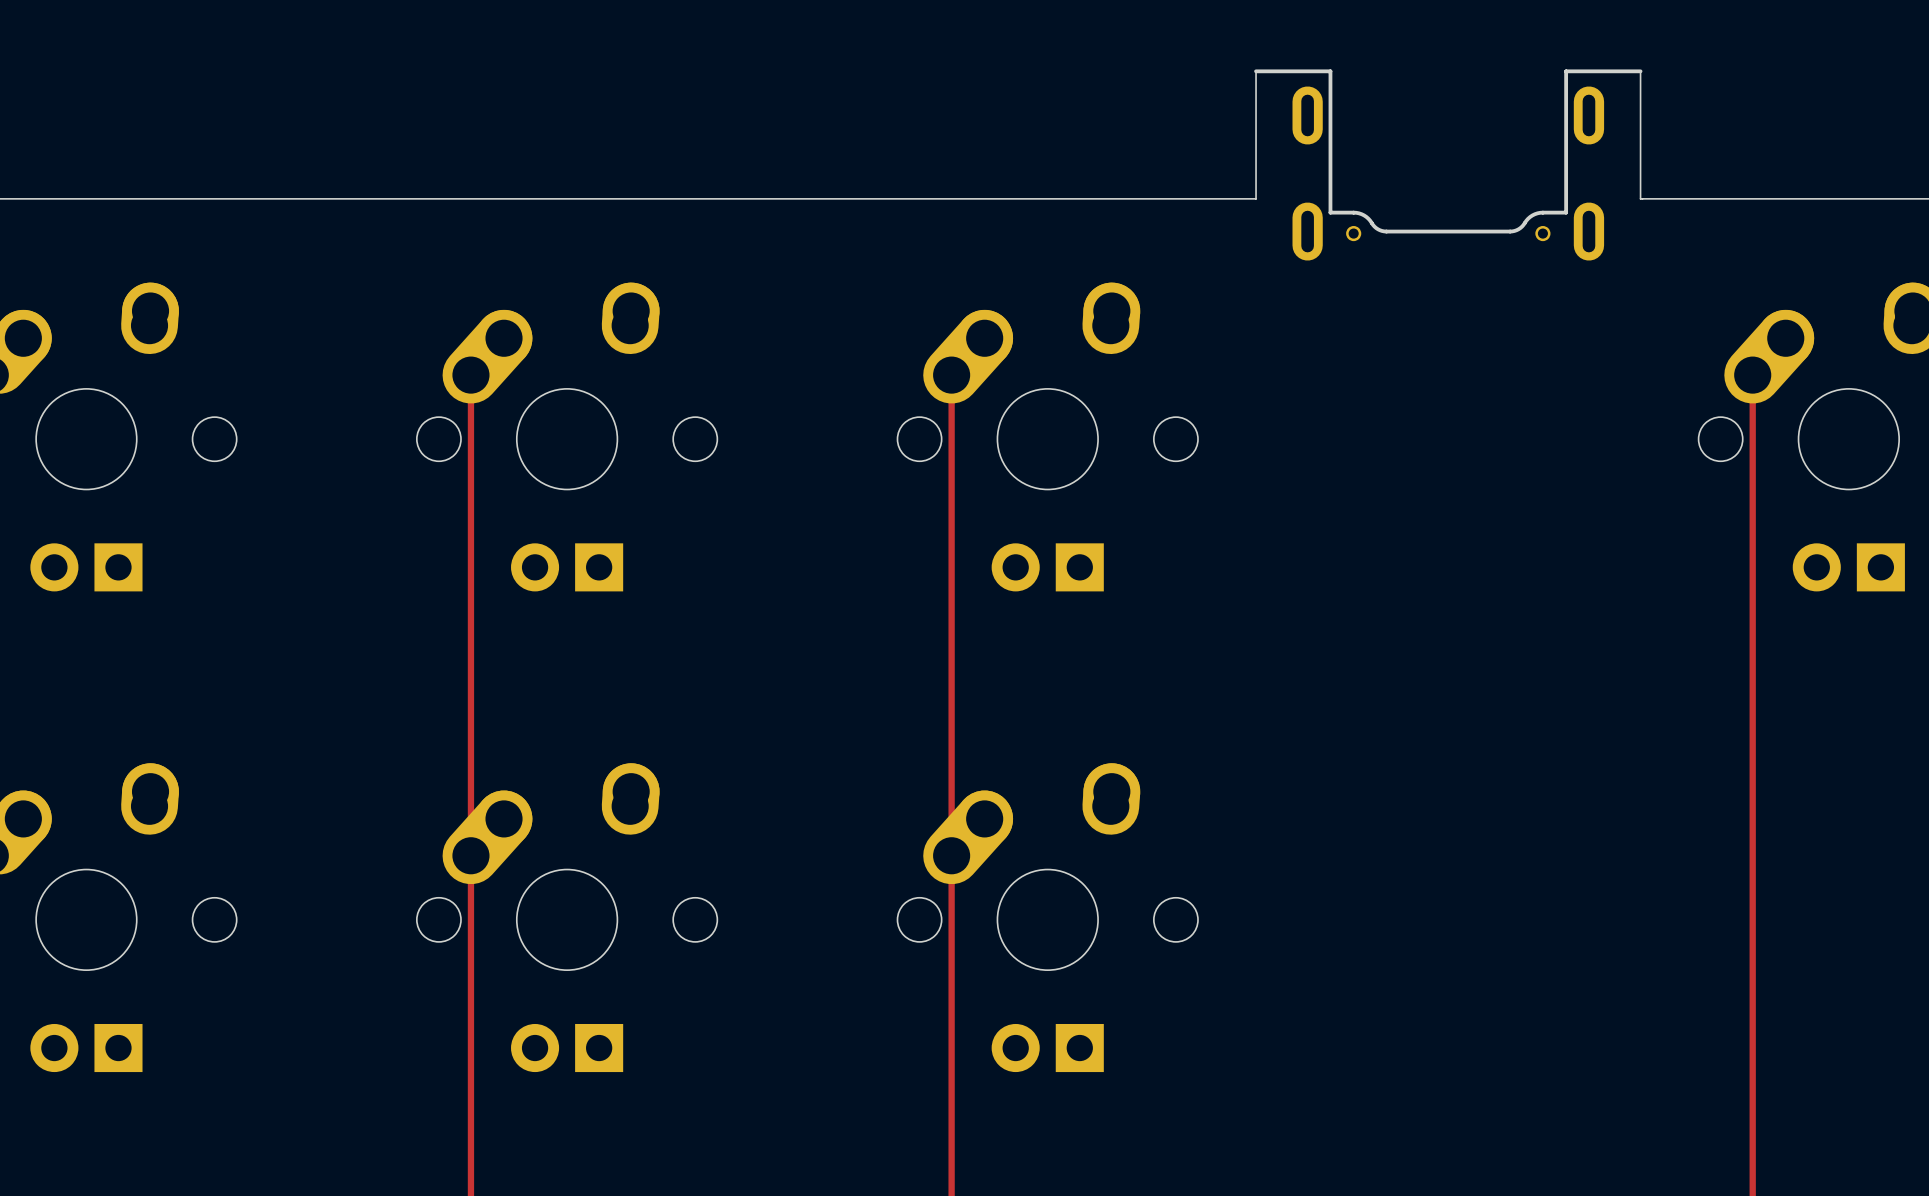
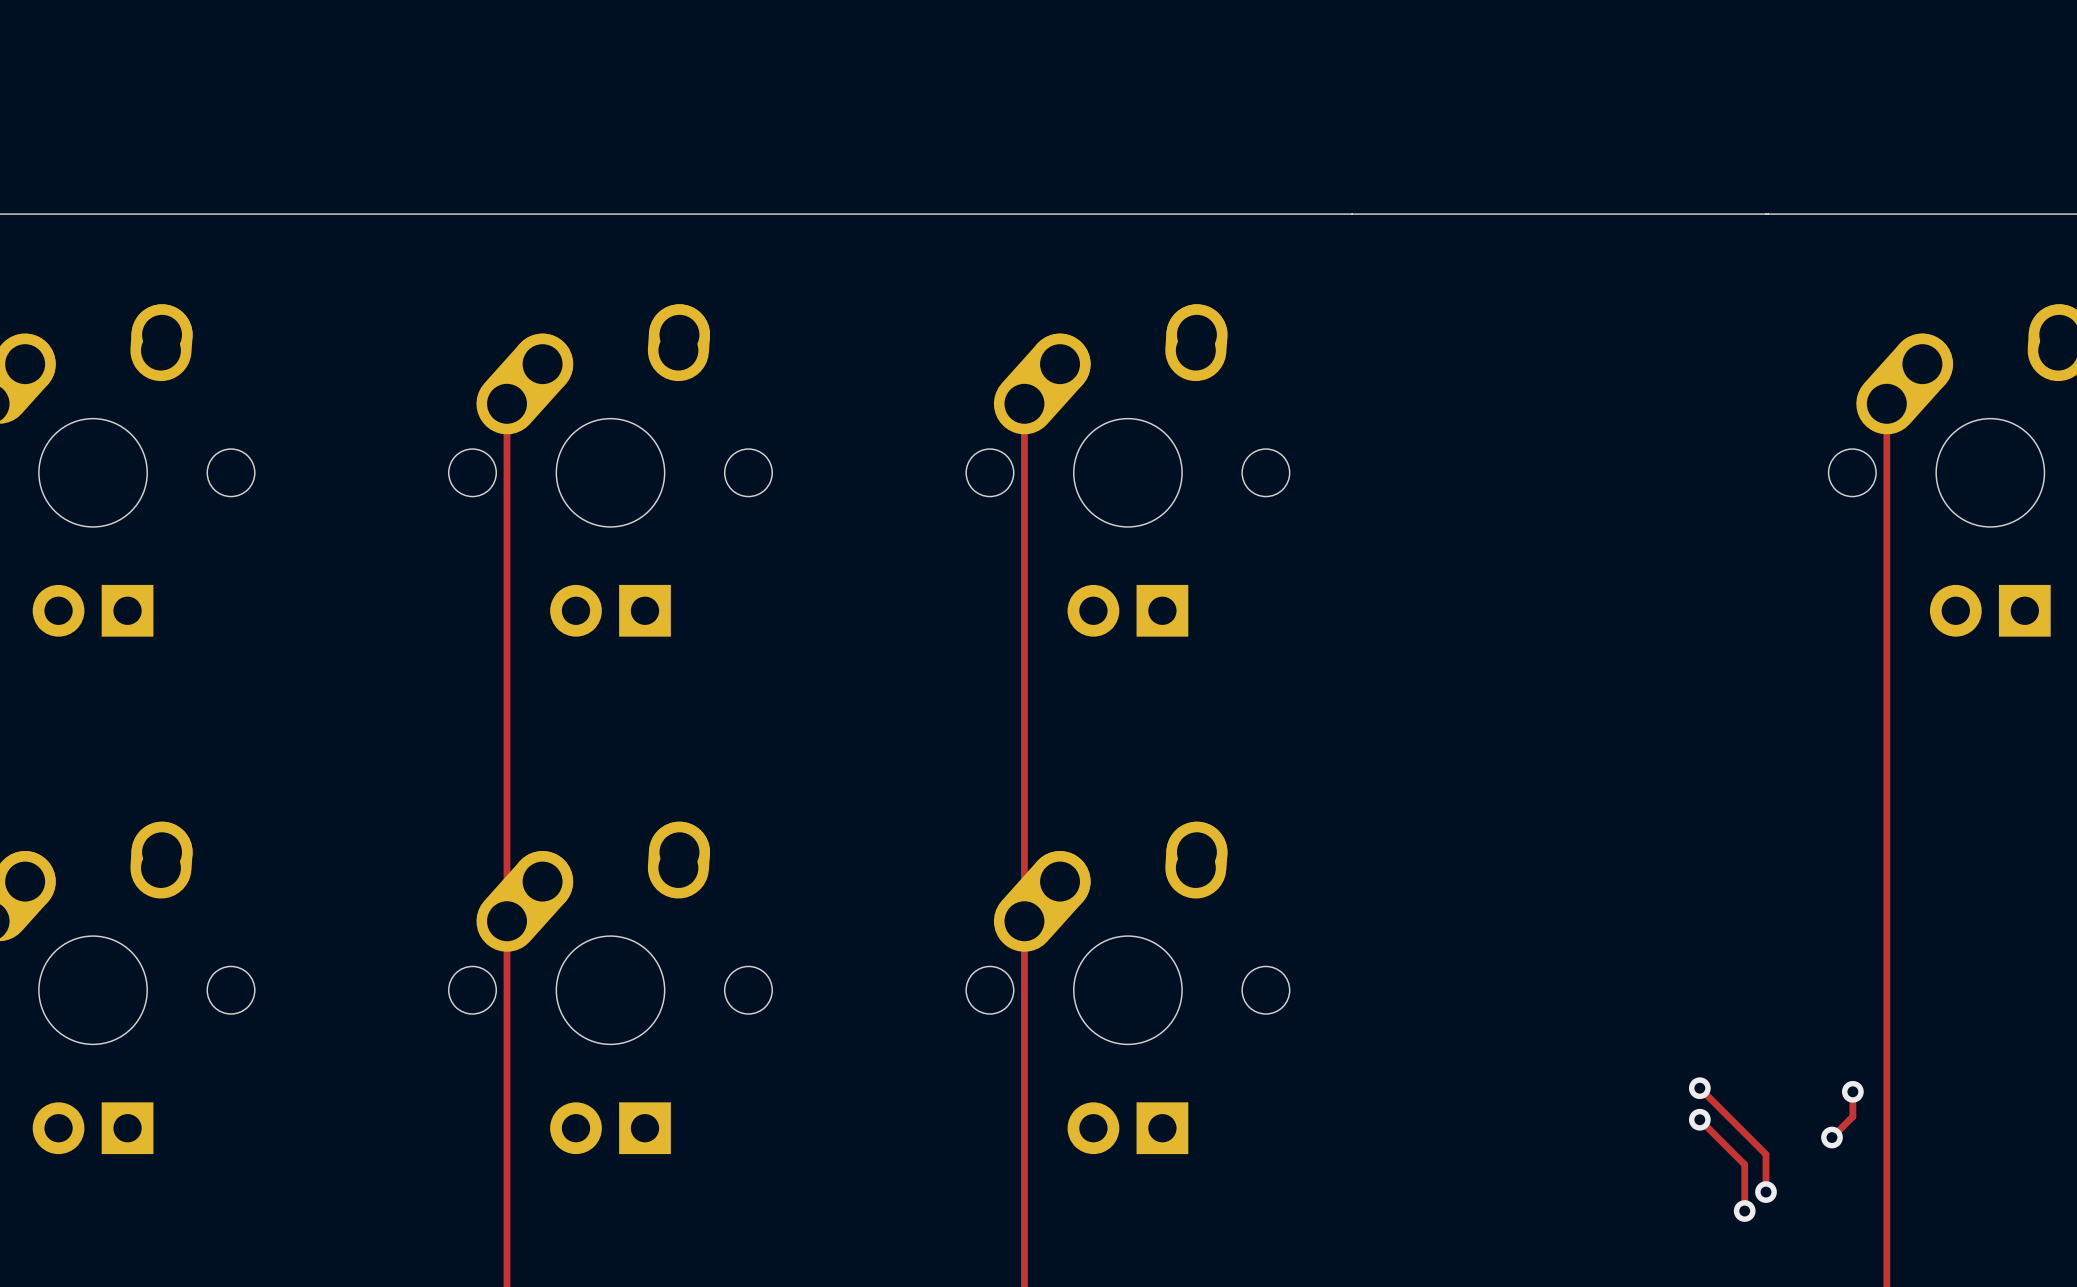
board edge: (1256, 71) (1256, 198) -> (1766, 214) (1352, 214)
board edge: (1640, 71) (1640, 198) -> none
part: (1448, 165) -> none
track: none -> (1699, 1088) (1765, 1154) (1765, 1192)
via: none -> (1699, 1088)
track: none -> (1852, 1091) (1852, 1116) (1831, 1137)
via: none -> (1852, 1091)
track: none -> (1699, 1119) (1744, 1164) (1744, 1211)
via: none -> (1699, 1119)
via: none -> (1831, 1137)
via: none -> (1765, 1192)
via: none -> (1744, 1211)

